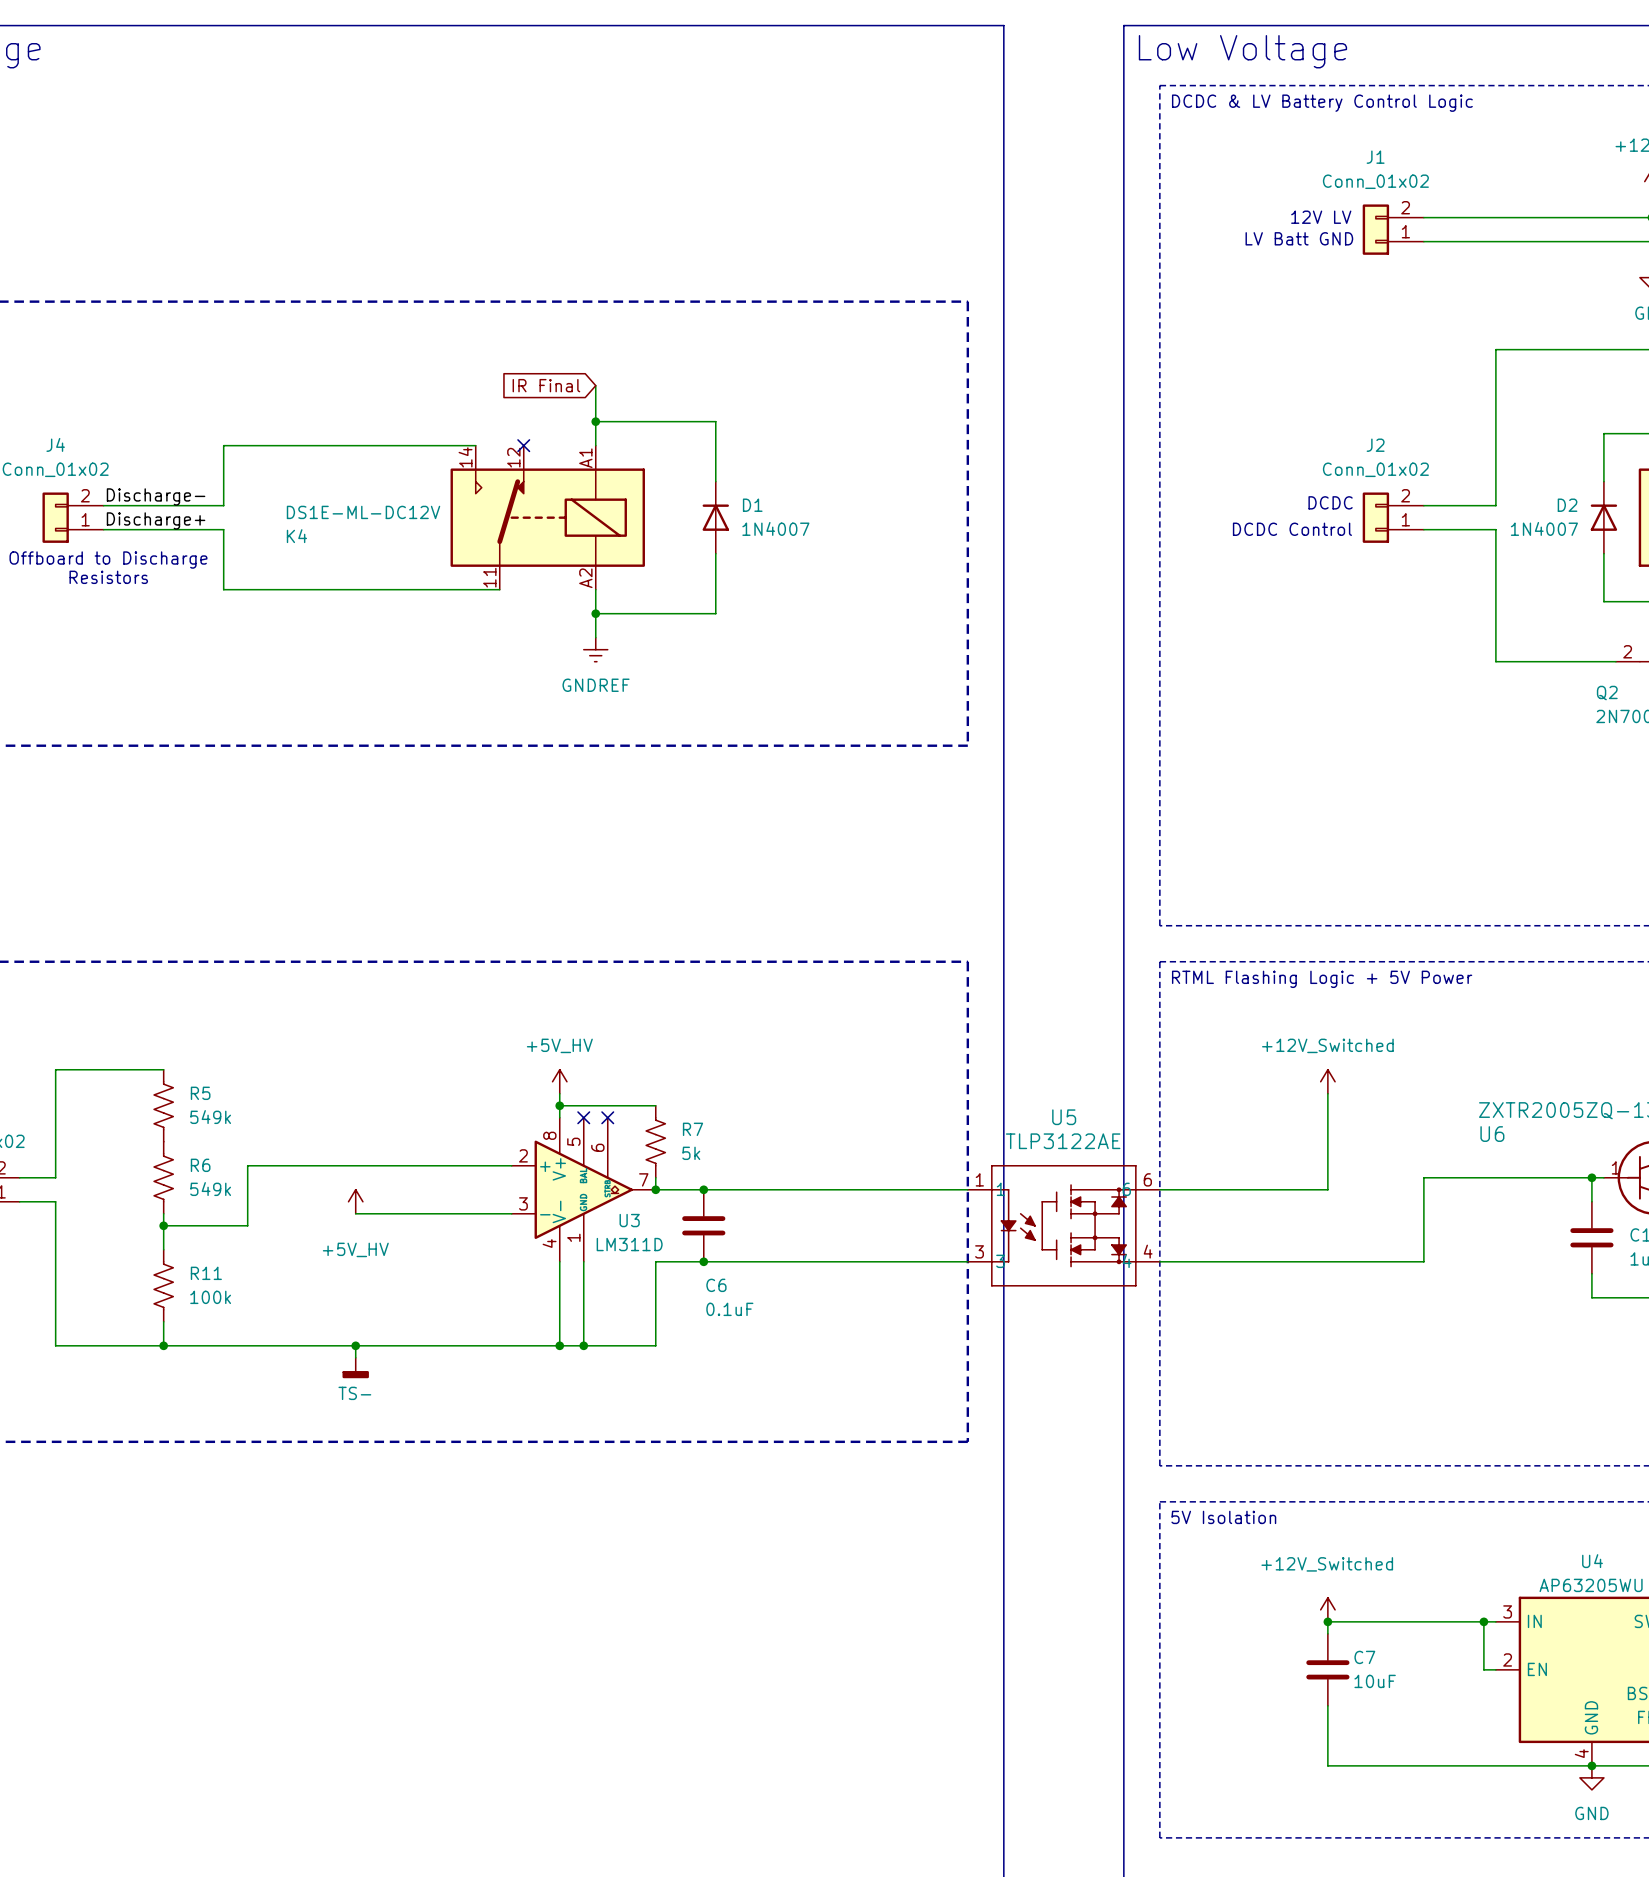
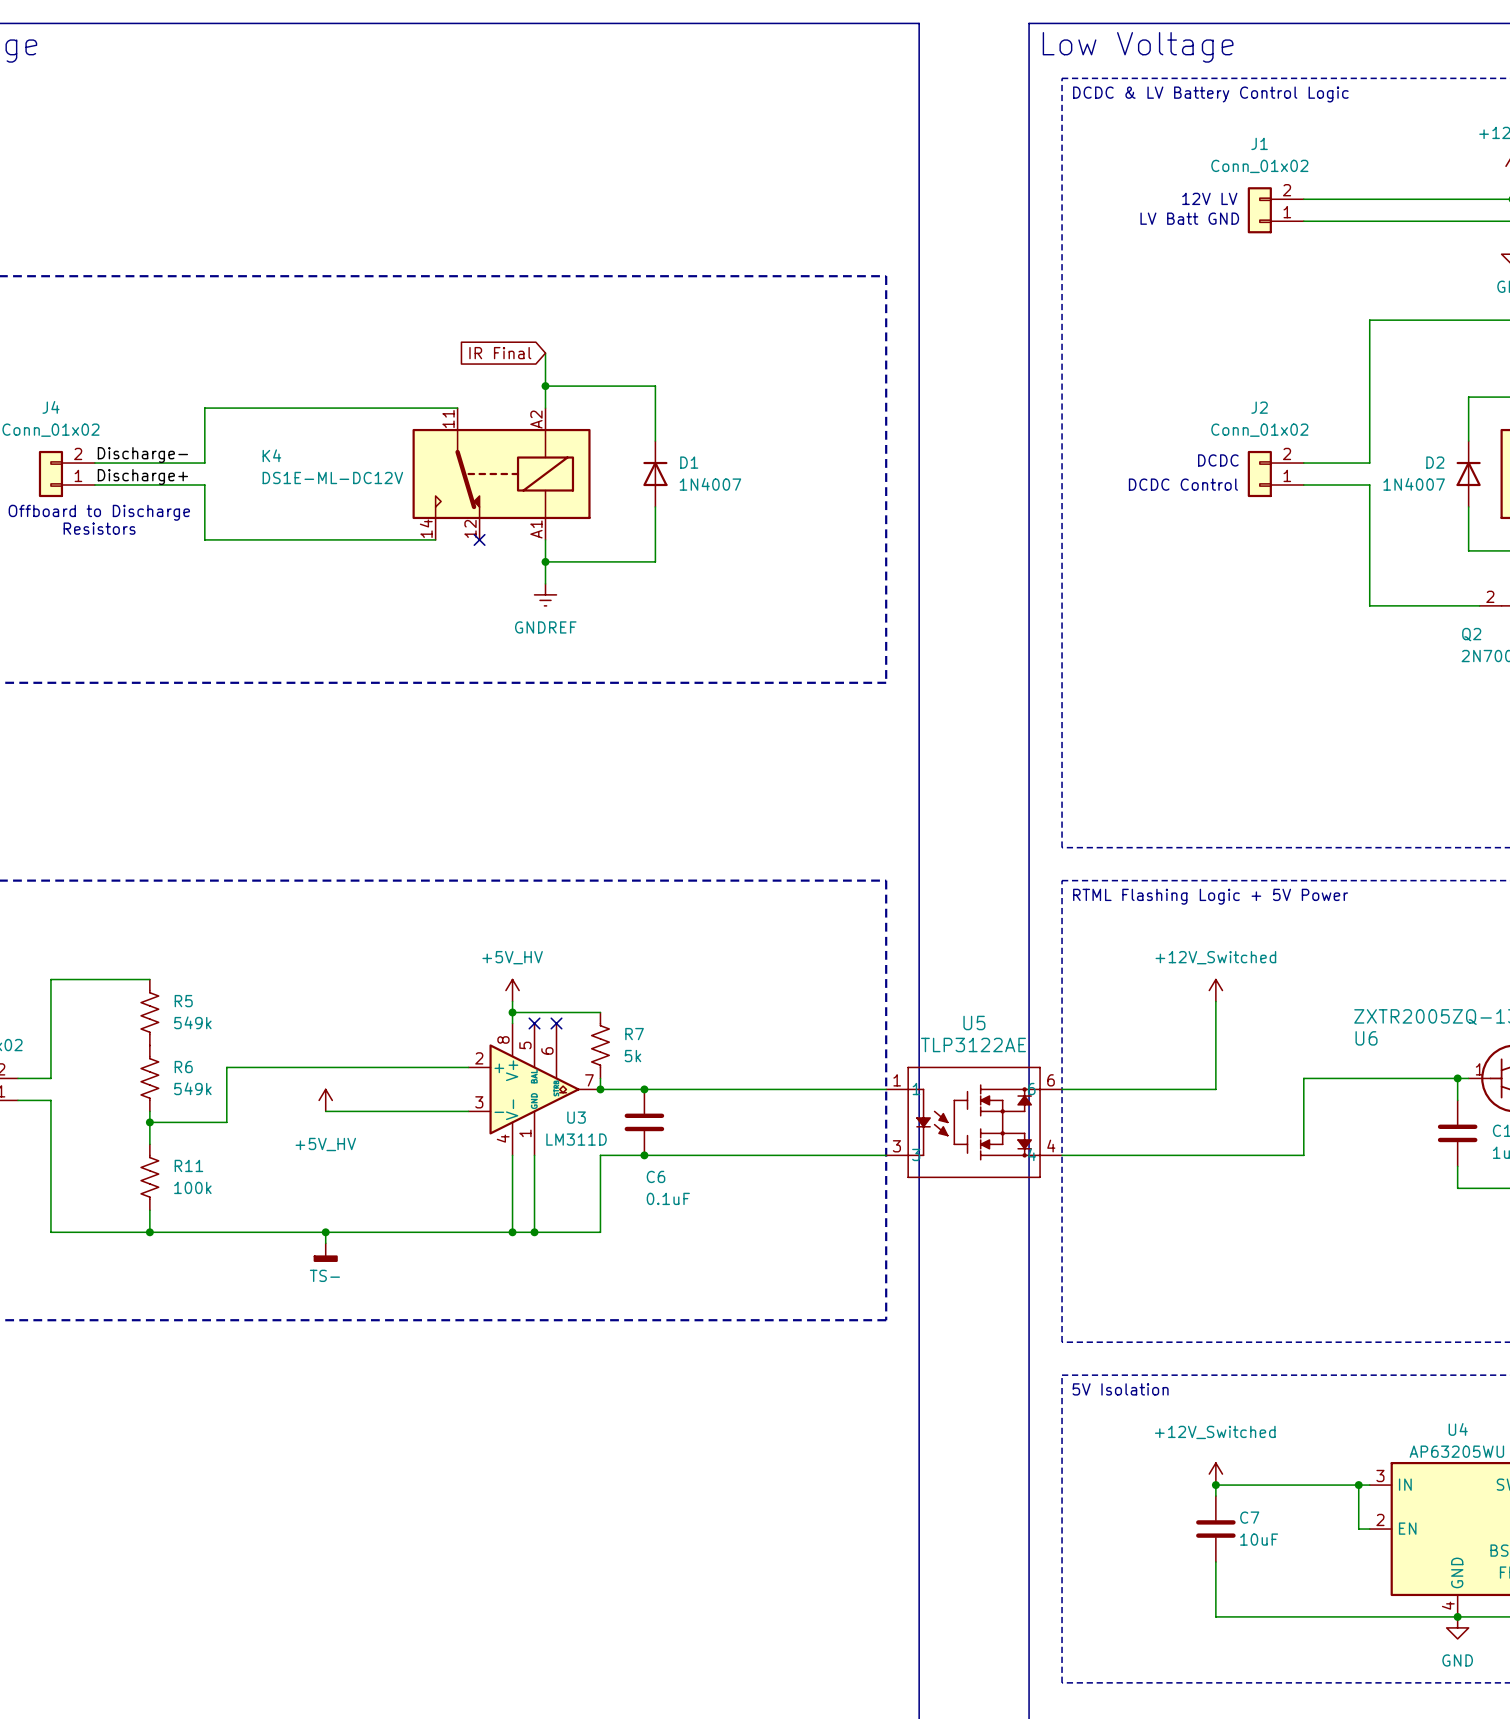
no-connect mark: (523, 445) -> none
K4 flip: as is (547, 517) -> up-down (501, 474)
wire: (475, 589) (499, 589) -> (435, 408) (457, 408)
no-connect mark: none -> (479, 539)

